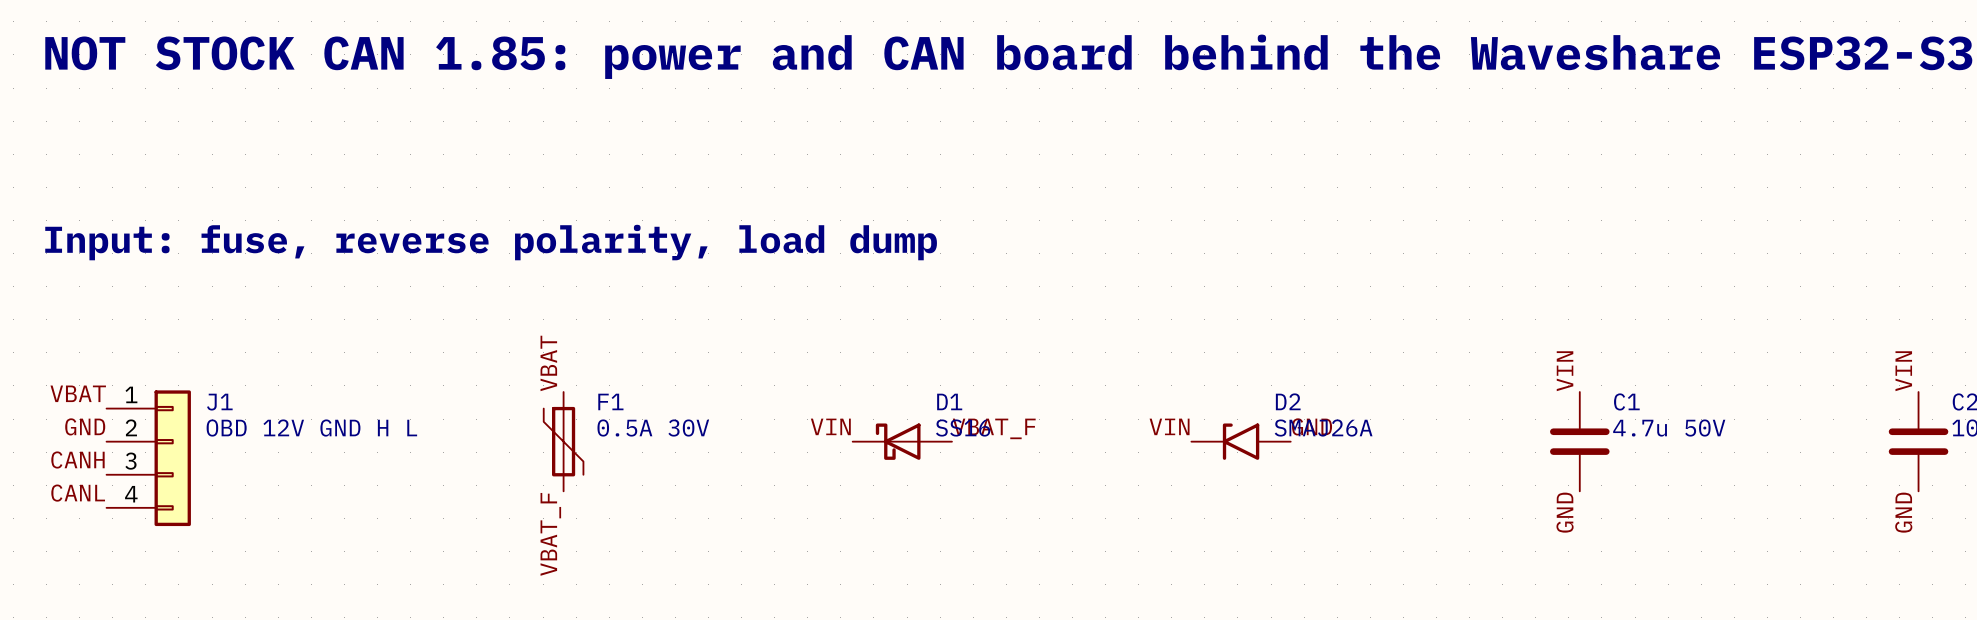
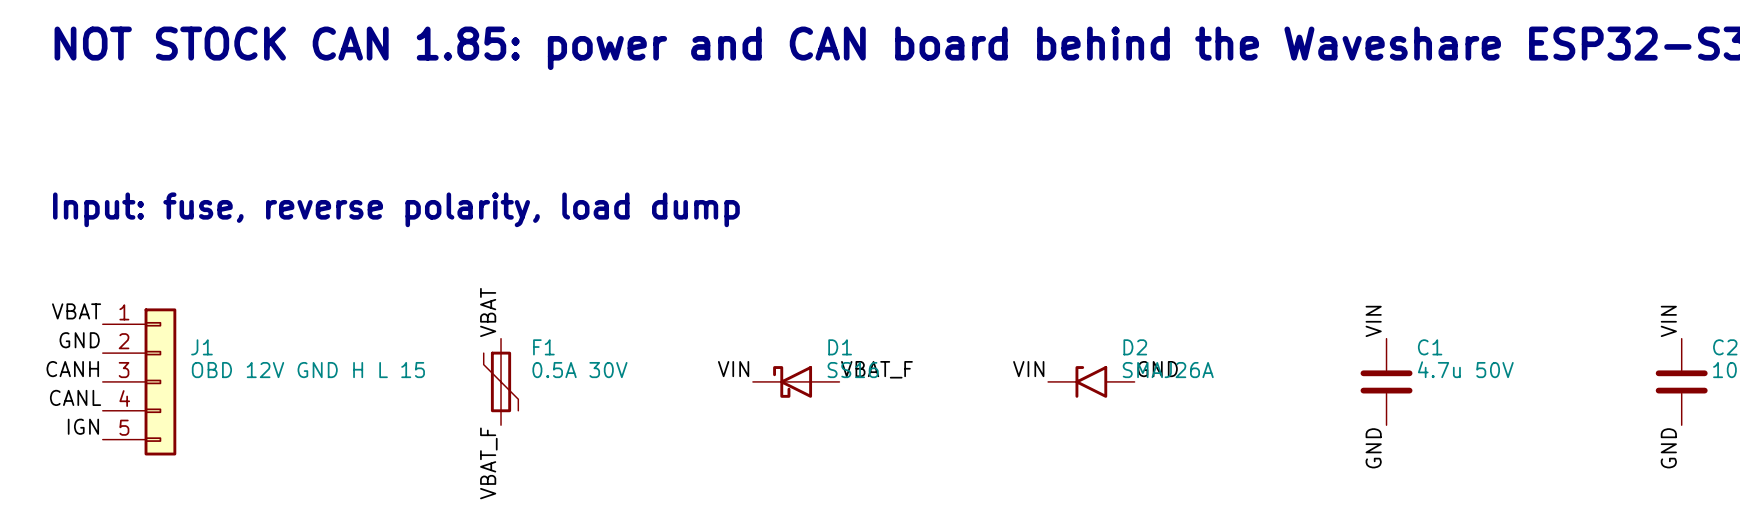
label: none -> VBAT (76, 311)
J1 symbol: [106, 390, 191, 527] -> [102, 308, 177, 456]
label: VBAT (78, 393) -> GND (79, 340)
label: GND (85, 426) -> CANH (72, 369)
J1 value: OBD 12V GND H L (311, 428) -> OBD 12V GND H L 15 (308, 370)
label: CANH (77, 459) -> CANL (75, 397)
label: CANL (78, 493) -> IGN (83, 426)

